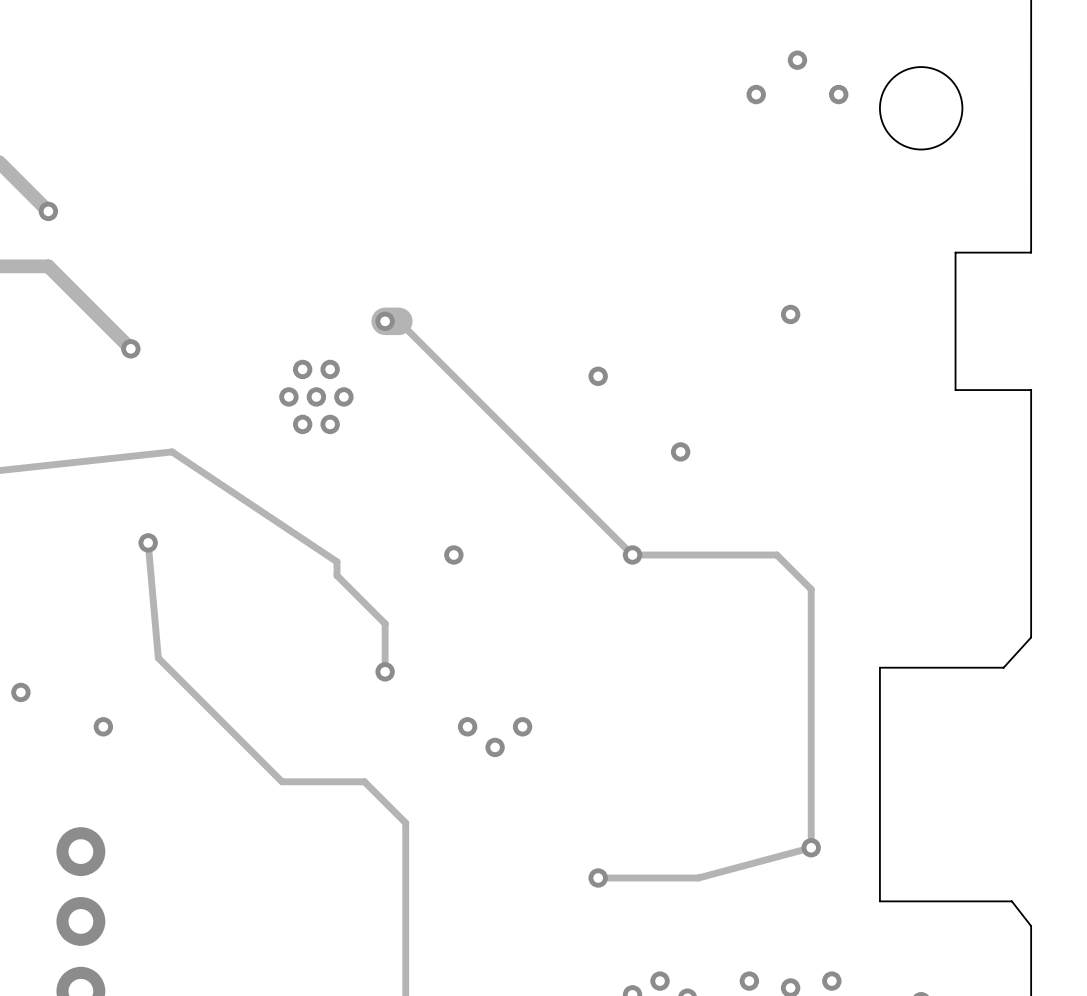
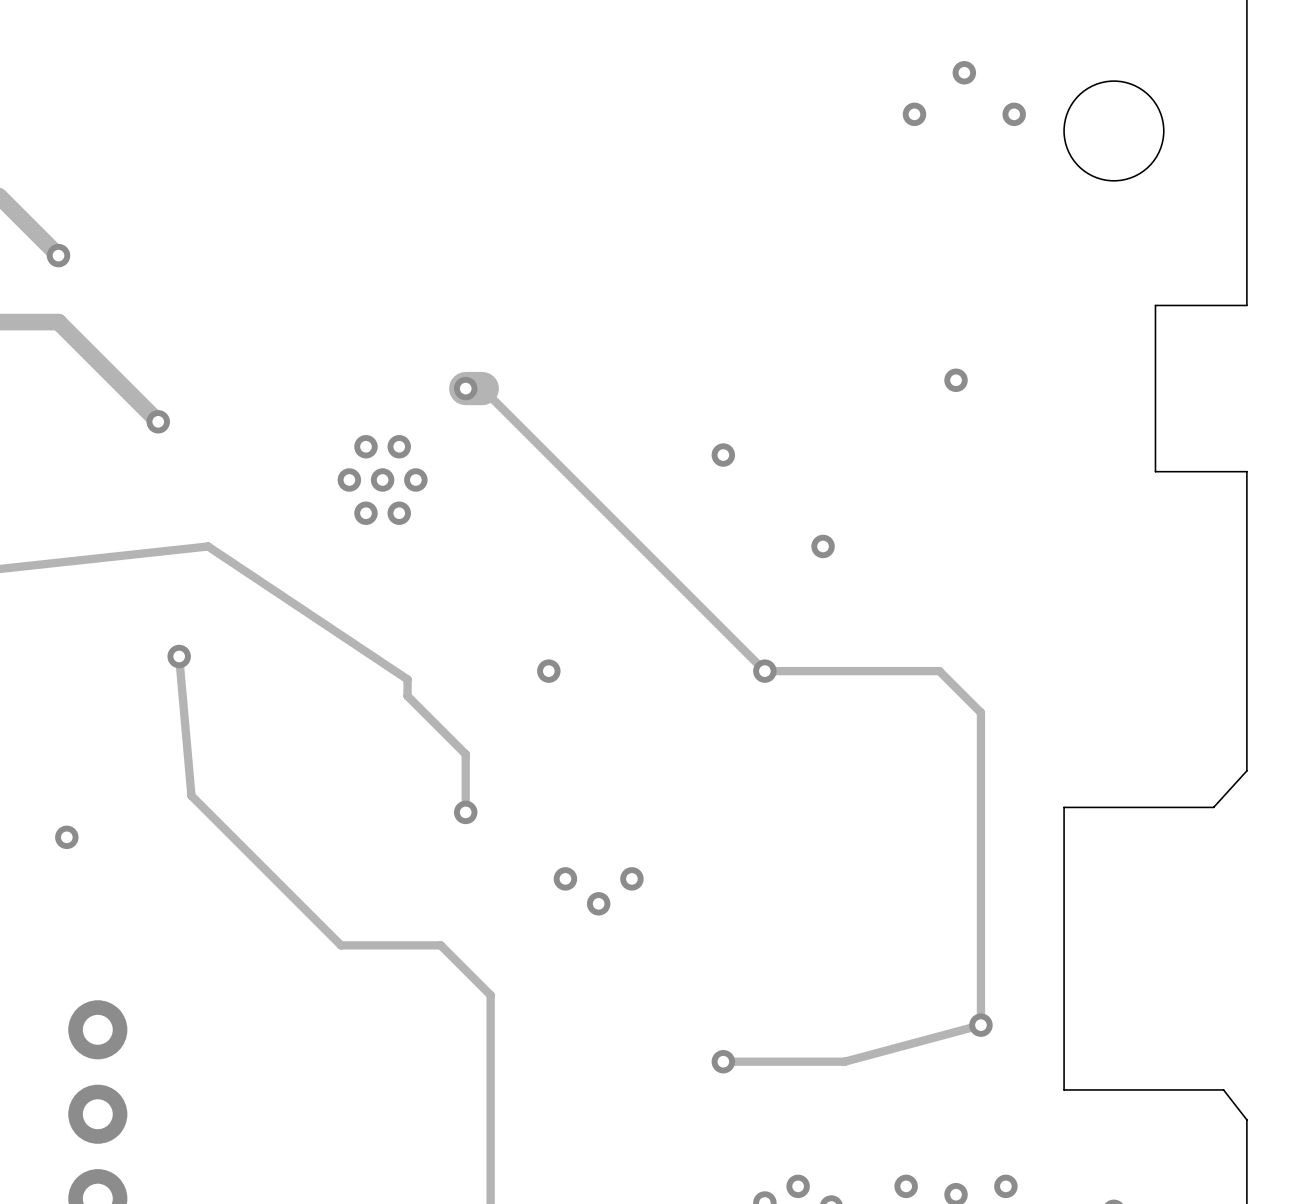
via: (20, 692) -> none
via: none -> (66, 837)
via: (103, 726) -> none

